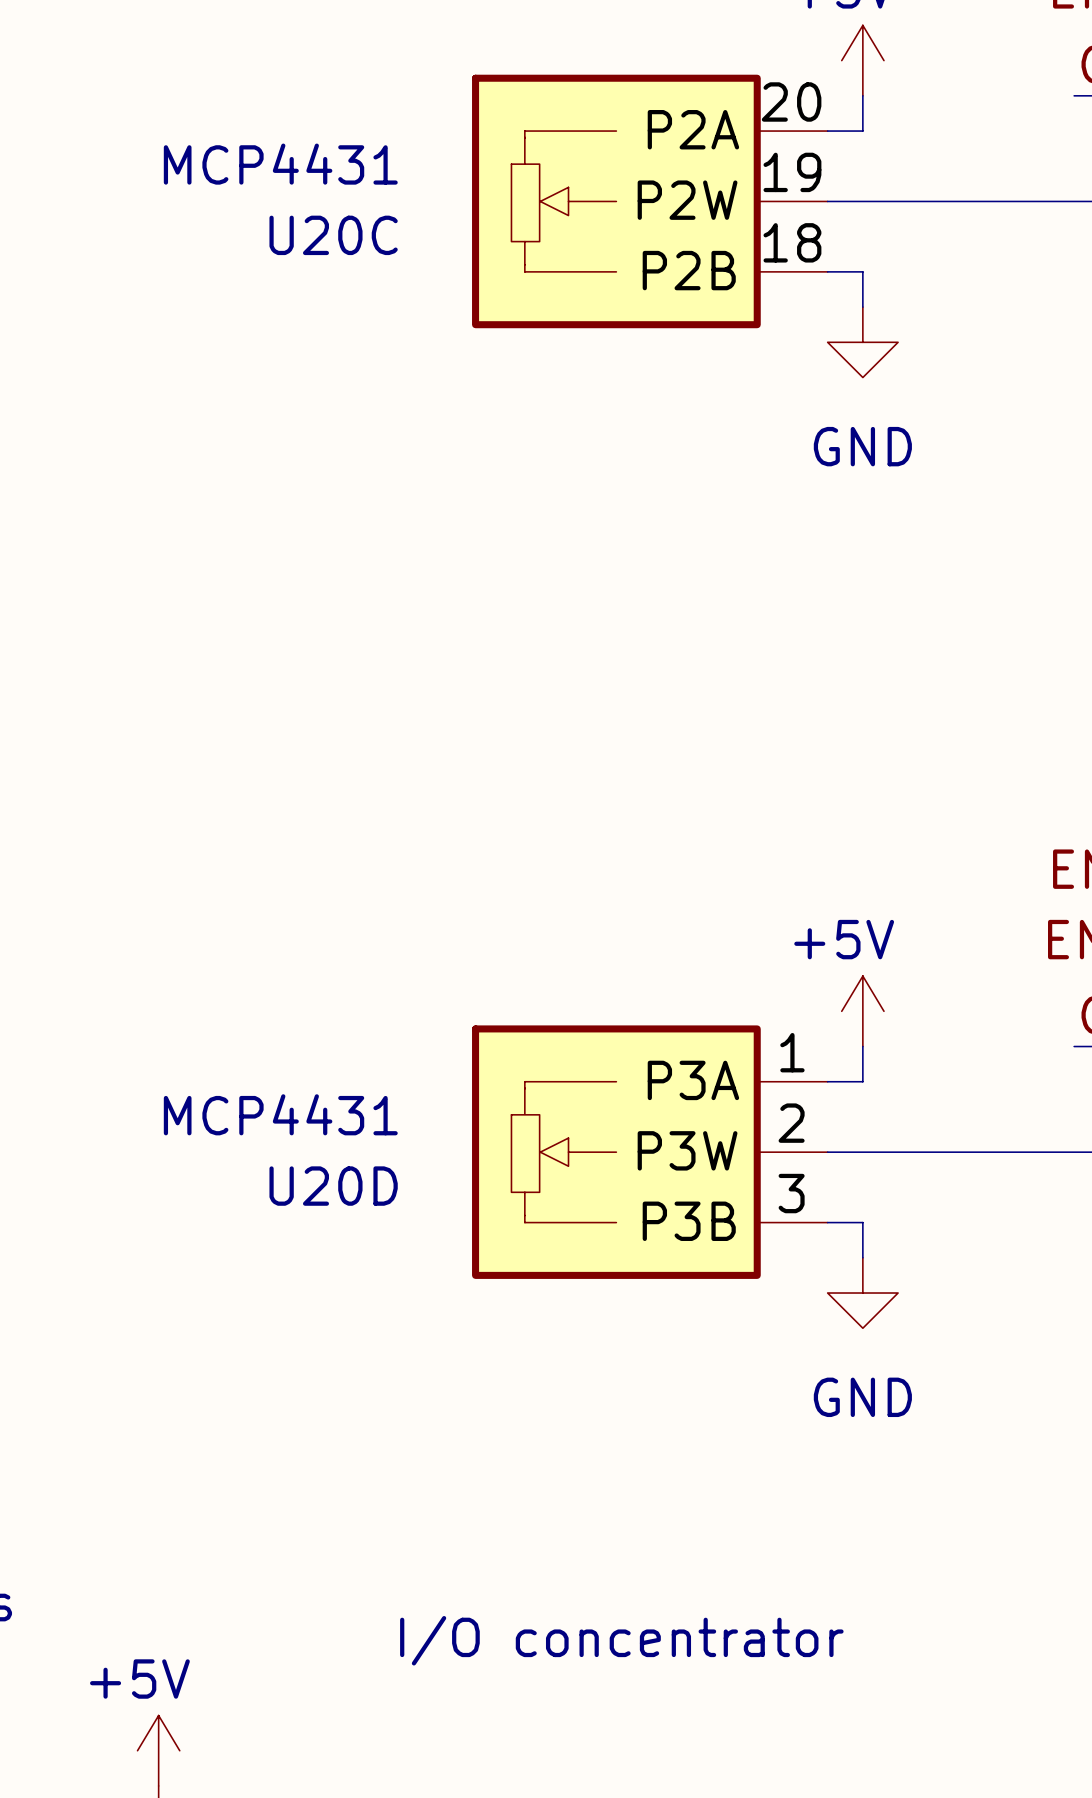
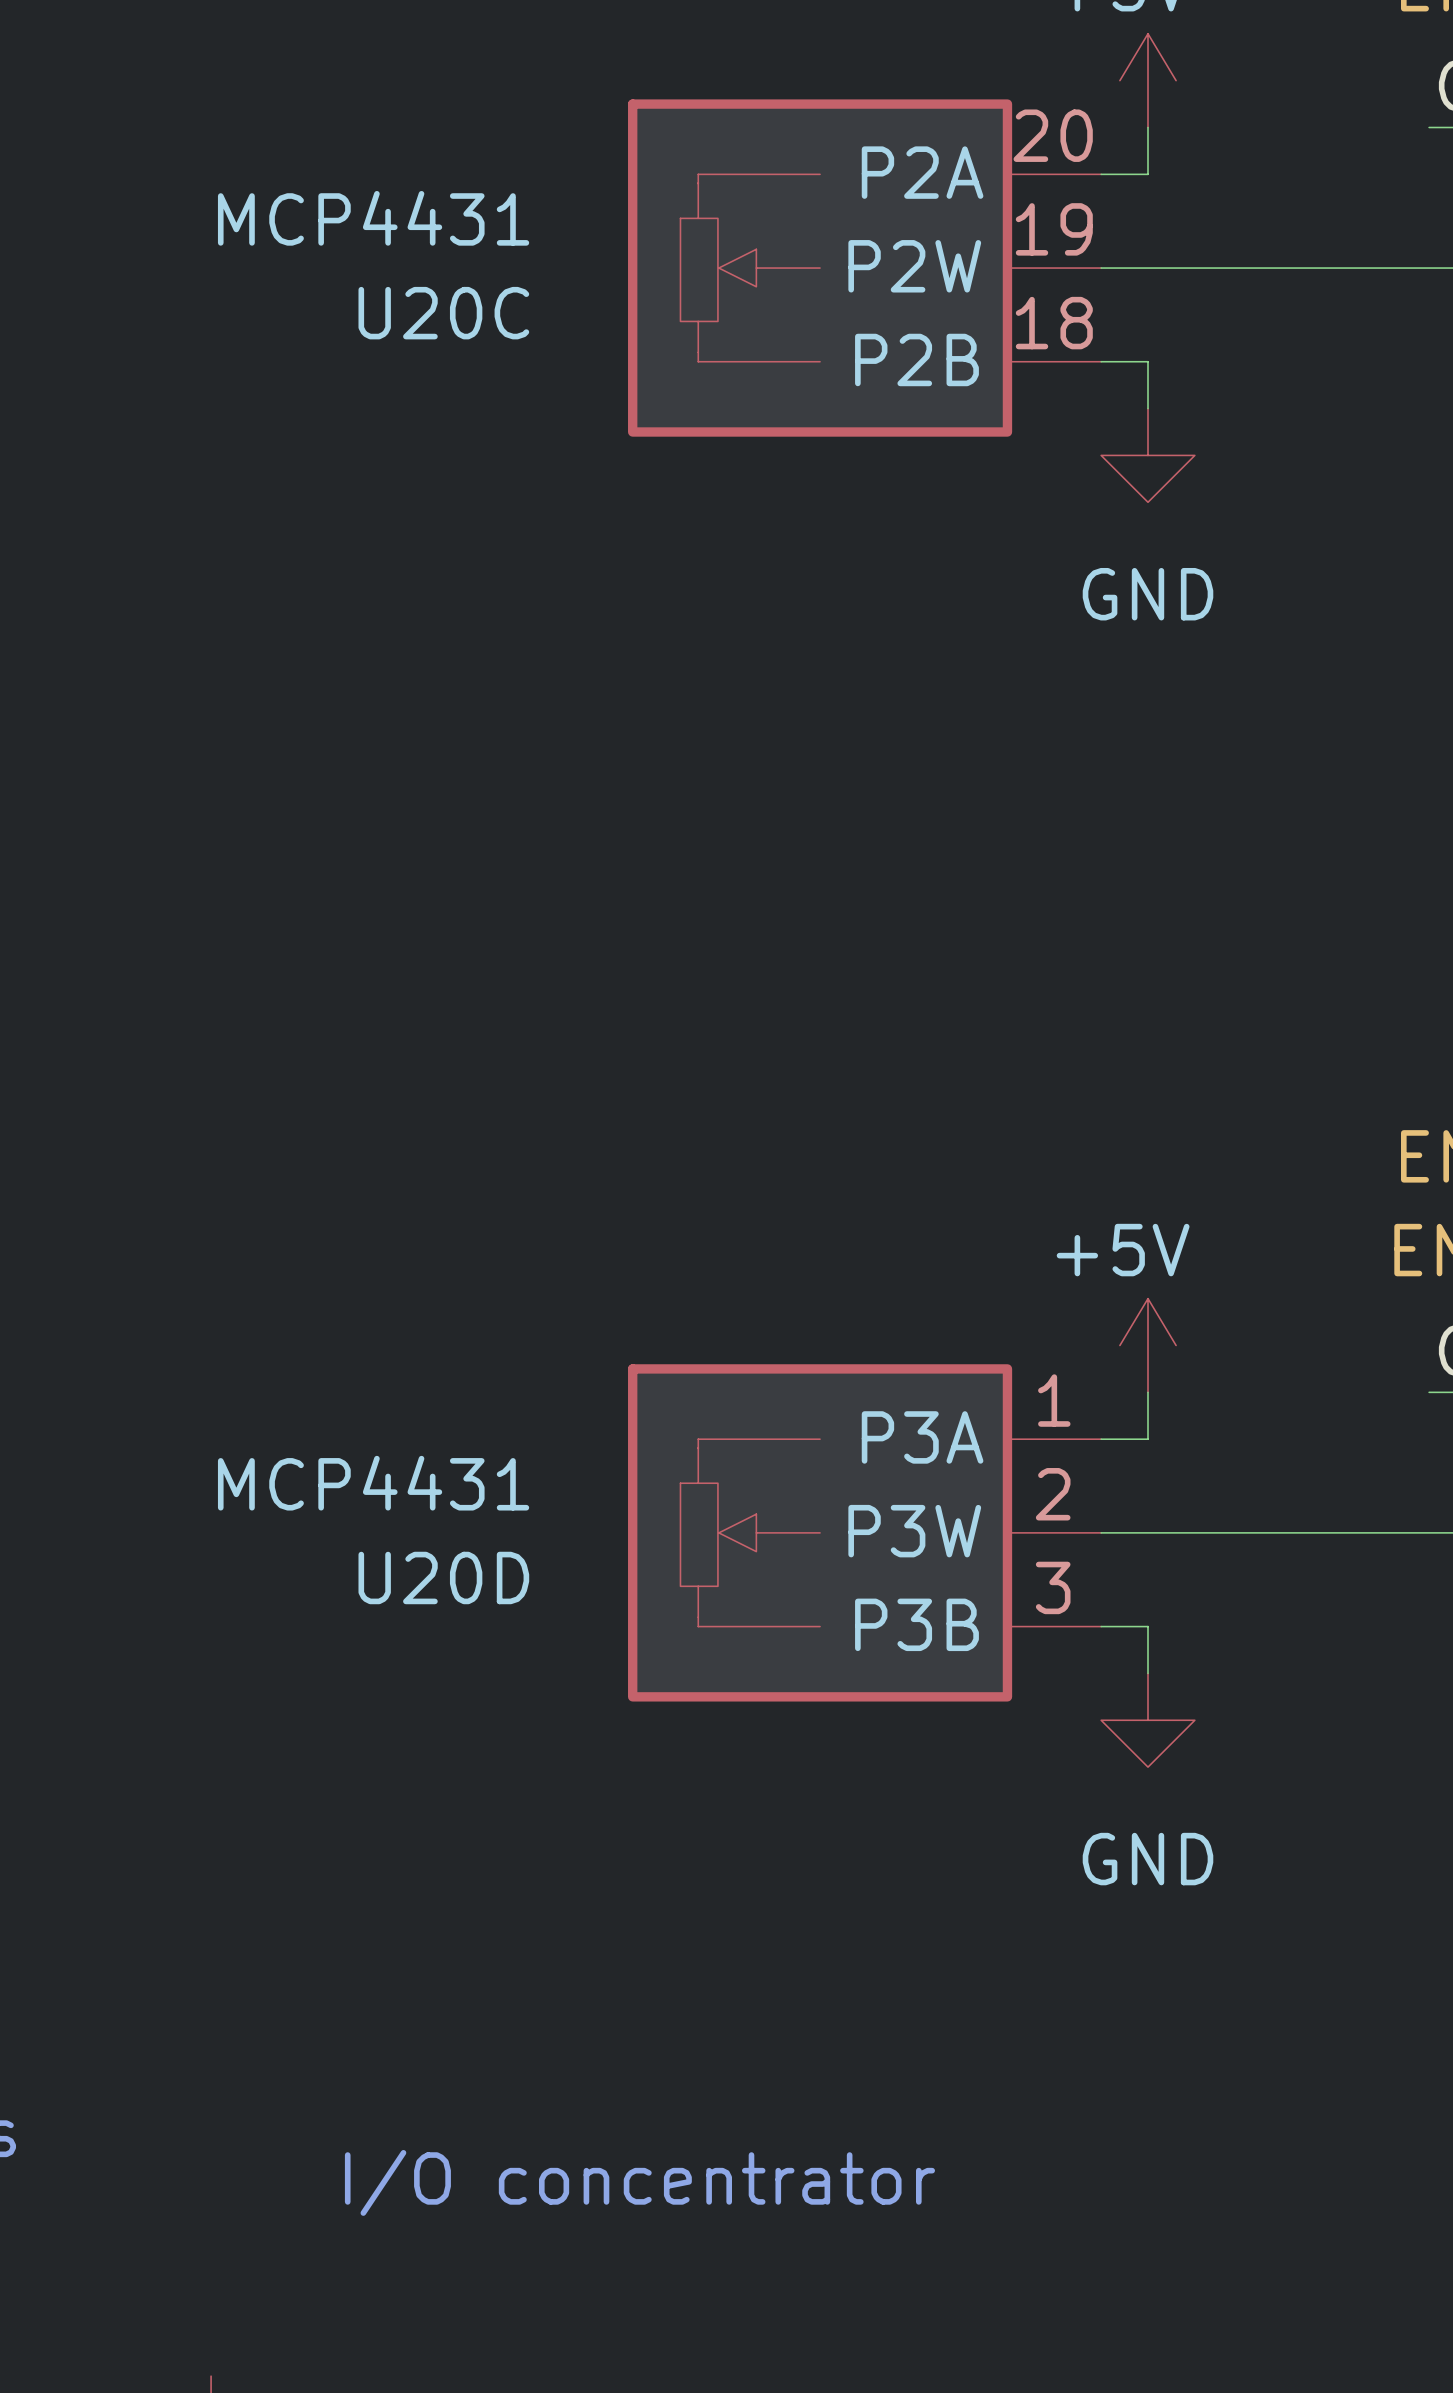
text position: I/O concentrator (621, 1640) -> I/O concentrator (639, 2182)
power symbol: +5V (158, 1750) -> none

